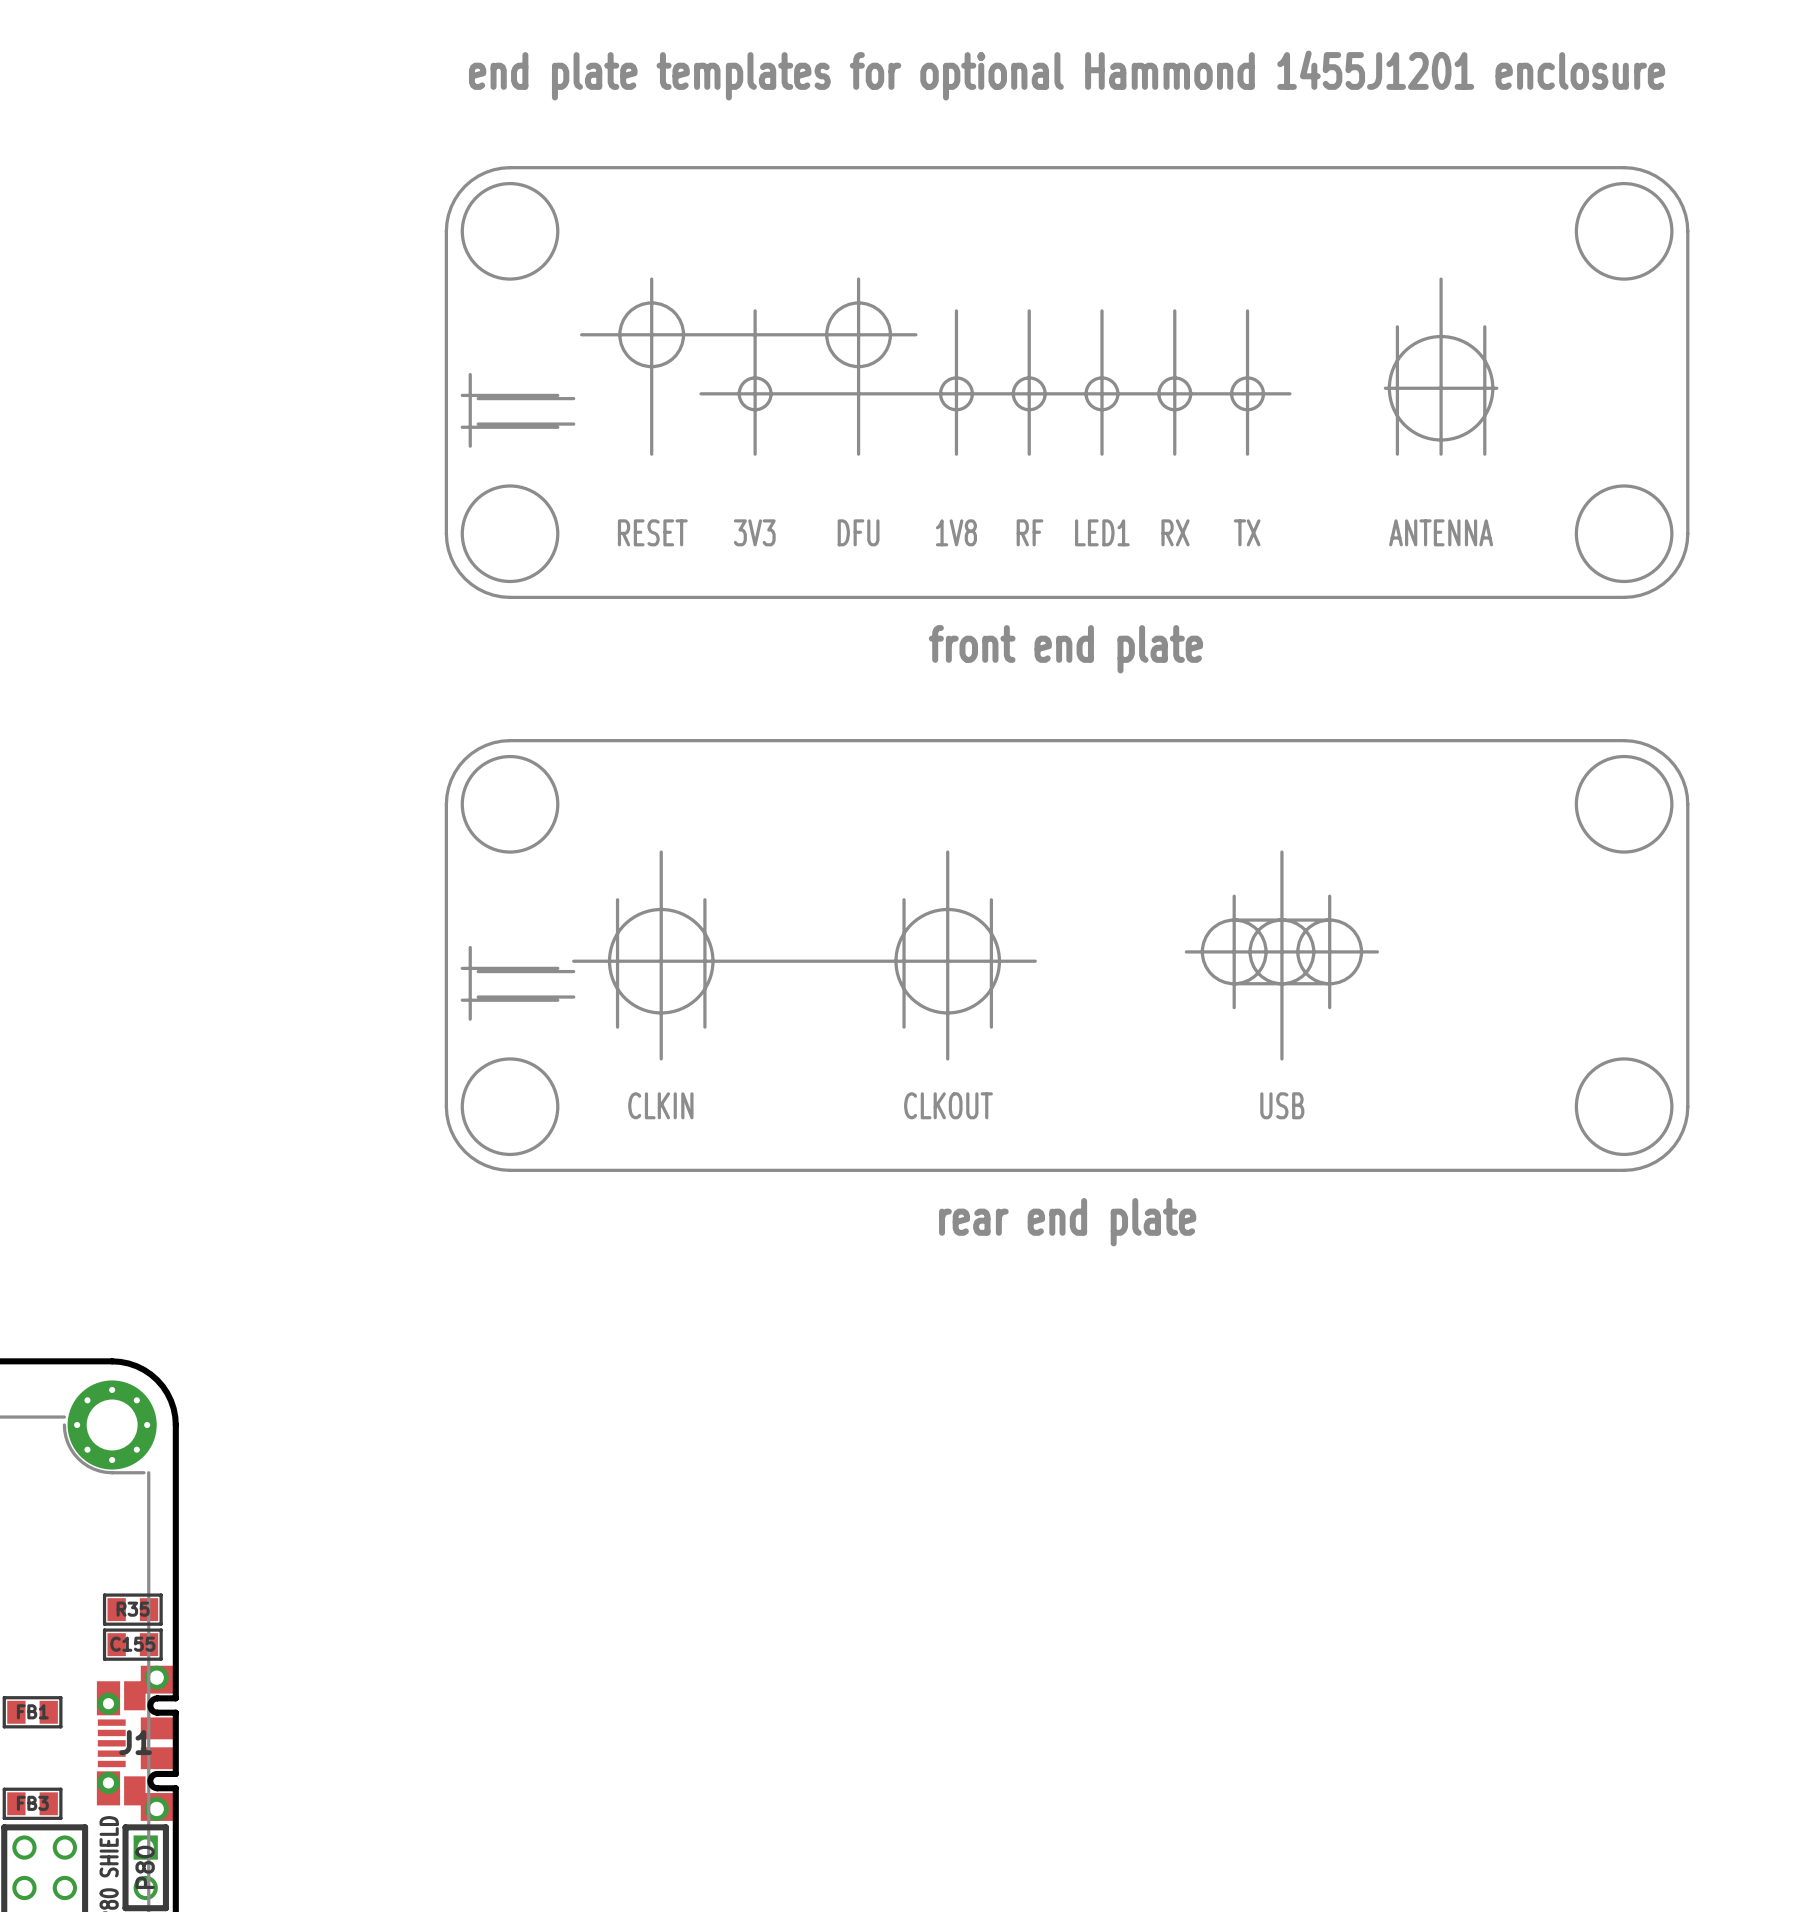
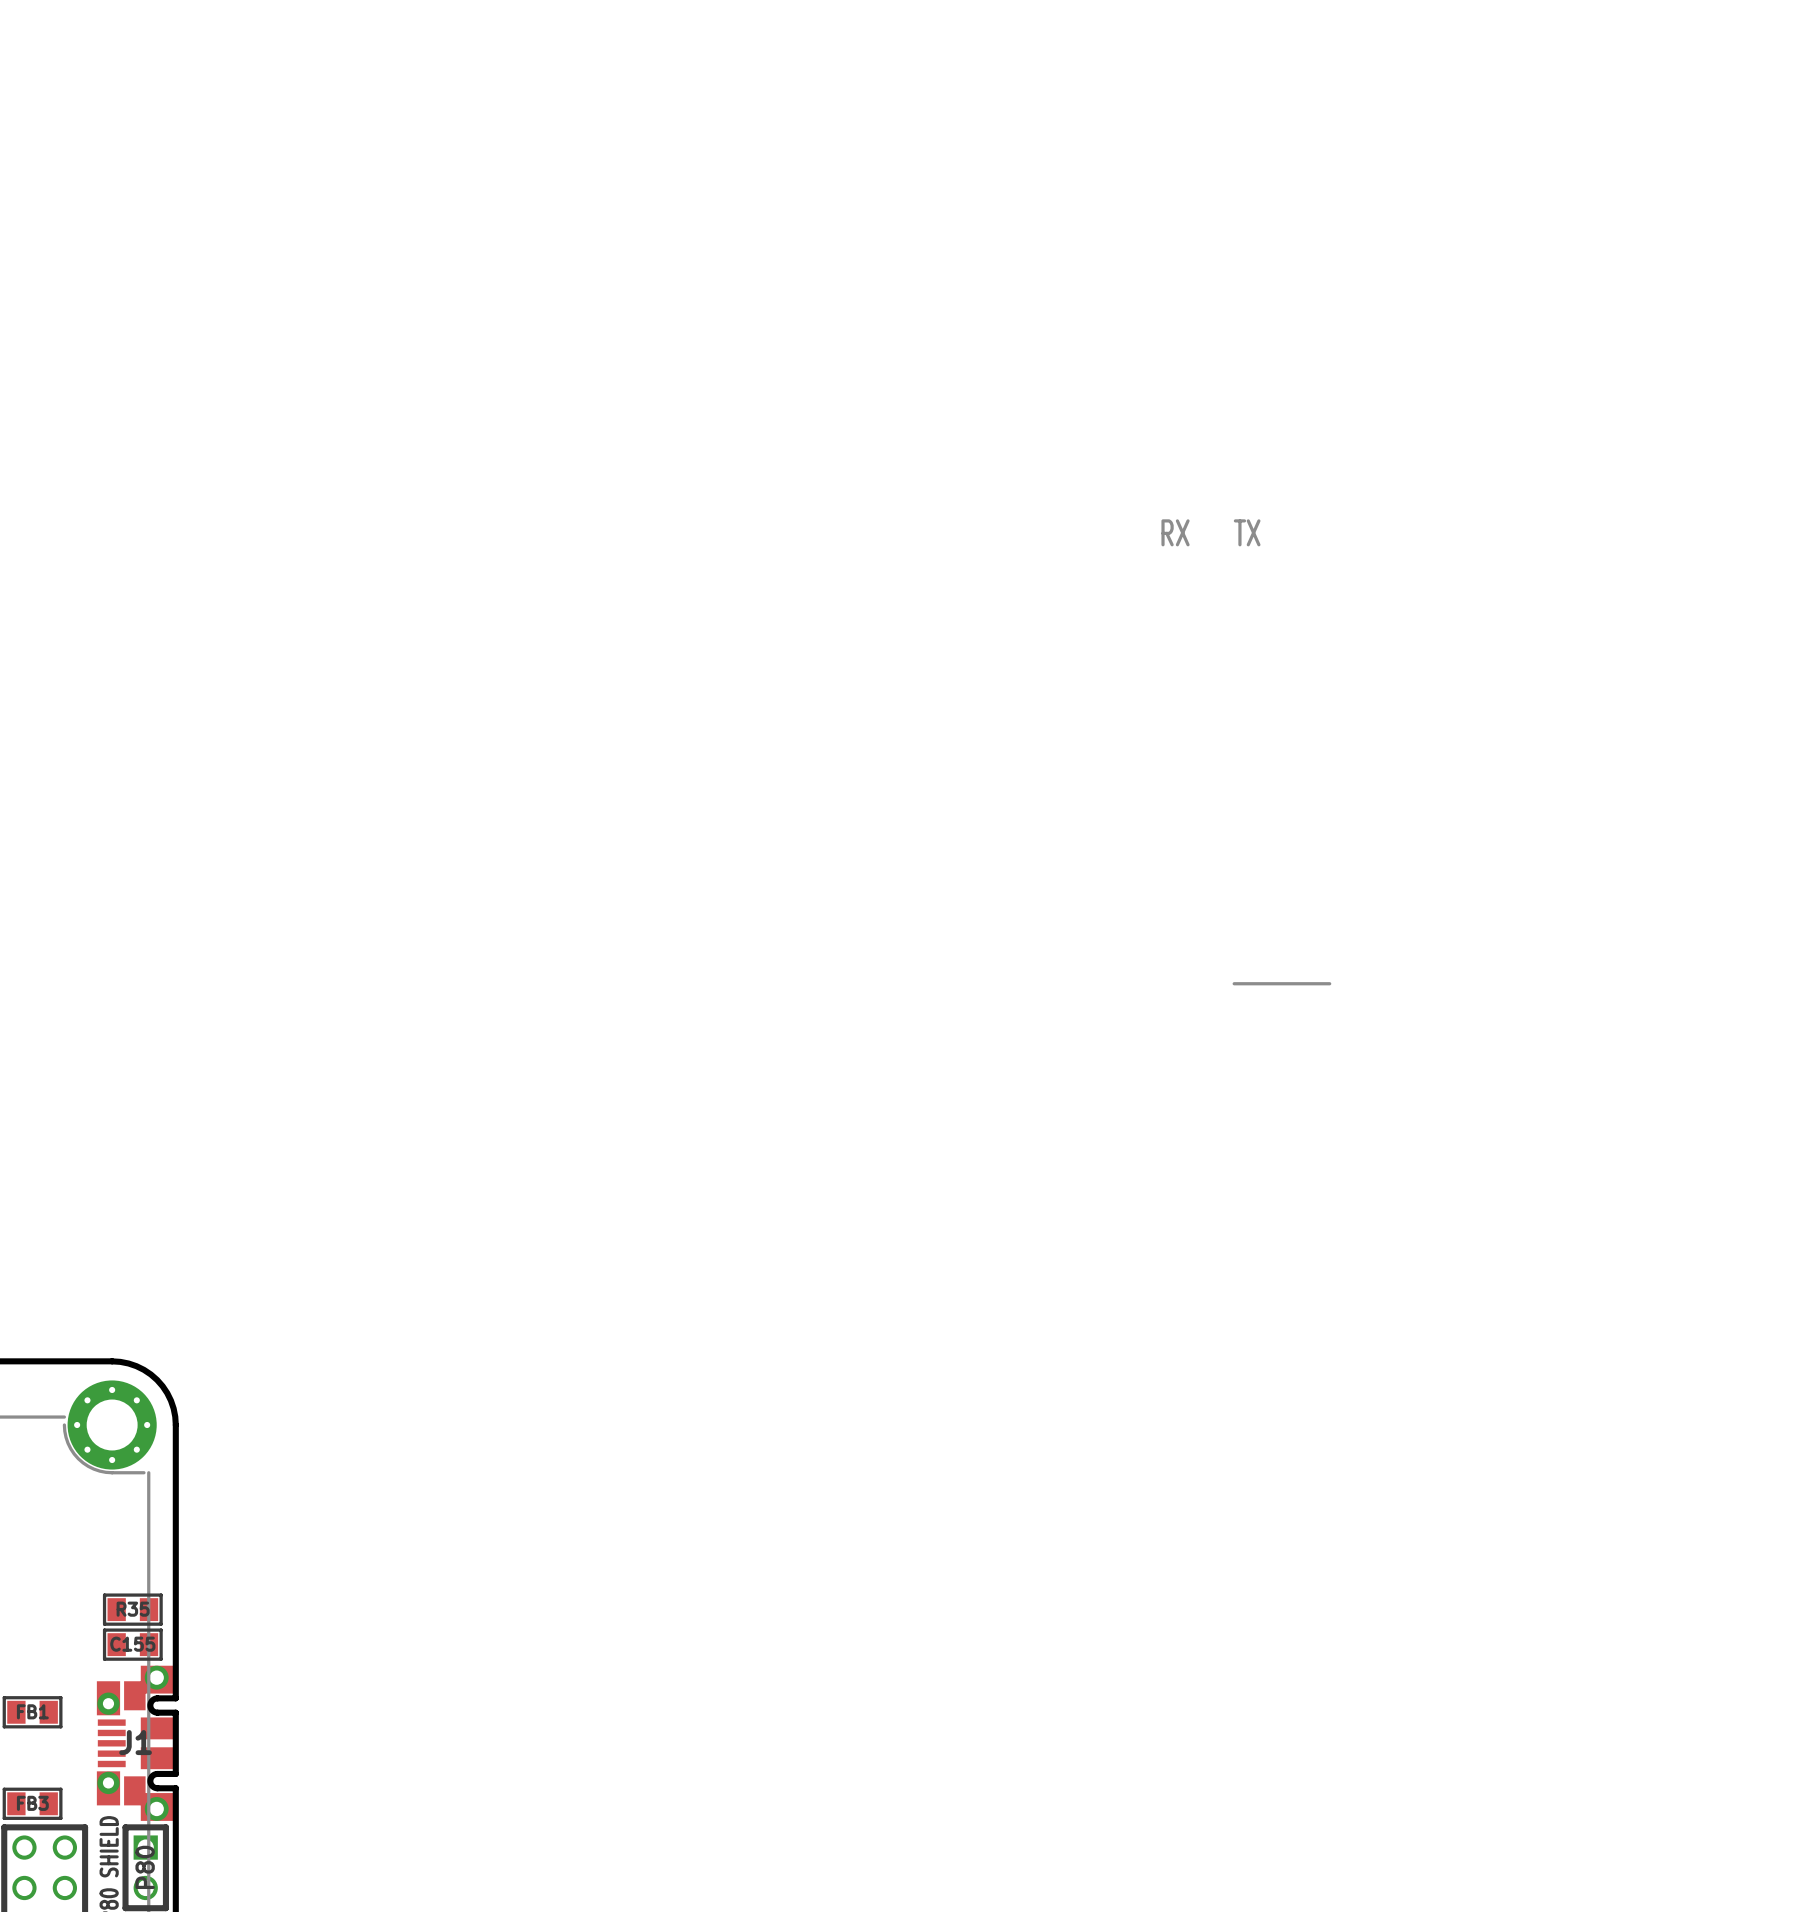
text: end plate templates for optional Hammond 1455J1201 enclosure (1067, 75) -> none
line: (510, 167) (1624, 167) (1640, 169) (1655, 176) (1669, 186) (1682, 206) (1687, 223) (1687, 533) (1685, 550) (1674, 572) (1662, 584) (1640, 595) (1624, 597) (510, 597) (493, 595) (478, 588) (465, 578) (454, 565) (446, 542) (446, 231) (451, 206) (465, 186) (485, 172) (510, 167) -> none
drawing: [460, 181, 560, 281] -> none
drawing: [1574, 181, 1674, 281] -> none
line: (651, 279) (651, 454) -> none
line: (858, 279) (858, 454) -> none
line: (1441, 279) (1441, 454) -> none
drawing: [618, 301, 686, 369] -> none
drawing: [825, 301, 893, 369] -> none
line: (755, 310) (755, 454) -> none
line: (956, 310) (956, 454) -> none
line: (1029, 310) (1029, 454) -> none
line: (1102, 310) (1102, 454) -> none
line: (1174, 310) (1174, 454) -> none
line: (1247, 310) (1247, 454) -> none
line: (1397, 326) (1397, 454) -> none
line: (1484, 326) (1484, 454) -> none
line: (581, 334) (915, 334) -> none
drawing: [1387, 334, 1495, 442] -> none
line: (470, 374) (470, 446) -> none
drawing: [737, 376, 773, 412] -> none
drawing: [938, 376, 975, 412] -> none
drawing: [1011, 376, 1047, 412] -> none
drawing: [1084, 376, 1120, 412] -> none
drawing: [1157, 376, 1193, 412] -> none
drawing: [1229, 376, 1266, 412] -> none
line: (1385, 388) (1496, 388) -> none
line: (701, 393) (1289, 393) -> none
line: (462, 395) (557, 395) -> none
line: (478, 398) (573, 398) -> none
line: (478, 424) (573, 424) -> none
line: (462, 427) (557, 427) -> none
drawing: [460, 484, 560, 584] -> none
drawing: [1574, 484, 1674, 584] -> none
text: RESET (652, 532) -> none
text: 3V3 (754, 532) -> none
text: DFU (858, 532) -> none
text: 1V8 (956, 532) -> none
text: RF (1029, 532) -> none
text: LED1 (1102, 532) -> none
text: ANTENNA (1441, 532) -> none
text: front end plate (1065, 649) -> none
line: (510, 740) (1624, 740) (1640, 742) (1655, 749) (1669, 759) (1682, 779) (1687, 795) (1687, 1106) (1685, 1123) (1674, 1145) (1662, 1157) (1640, 1168) (1624, 1170) (510, 1170) (493, 1168) (478, 1161) (465, 1151) (454, 1138) (446, 1115) (446, 804) (451, 779) (465, 759) (485, 745) (510, 740) -> none
drawing: [460, 754, 560, 854] -> none
drawing: [1574, 754, 1674, 854] -> none
line: (661, 852) (661, 1058) -> none
line: (947, 852) (947, 1058) -> none
line: (1281, 852) (1281, 1058) -> none
line: (1234, 896) (1234, 1007) -> none
line: (1329, 896) (1329, 1007) -> none
line: (617, 899) (617, 1027) -> none
line: (704, 899) (704, 1027) -> none
line: (904, 899) (904, 1027) -> none
line: (991, 899) (991, 1027) -> none
drawing: [607, 907, 715, 1015] -> none
drawing: [894, 907, 1002, 1015] -> none
drawing: [1200, 918, 1364, 986] -> none
line: (1234, 920) (1329, 920) -> none
line: (470, 947) (470, 1019) -> none
line: (1186, 951) (1377, 951) -> none
line: (573, 961) (1035, 961) -> none
line: (462, 968) (557, 968) -> none
line: (478, 971) (573, 971) -> none
line: (478, 997) (573, 997) -> none
line: (462, 1000) (557, 1000) -> none
drawing: [460, 1057, 560, 1157] -> none
drawing: [1574, 1057, 1674, 1157] -> none
text: CLKIN (660, 1105) -> none
text: CLKOUT (948, 1105) -> none
text: USB (1282, 1105) -> none
text: rear end plate (1067, 1222) -> none

